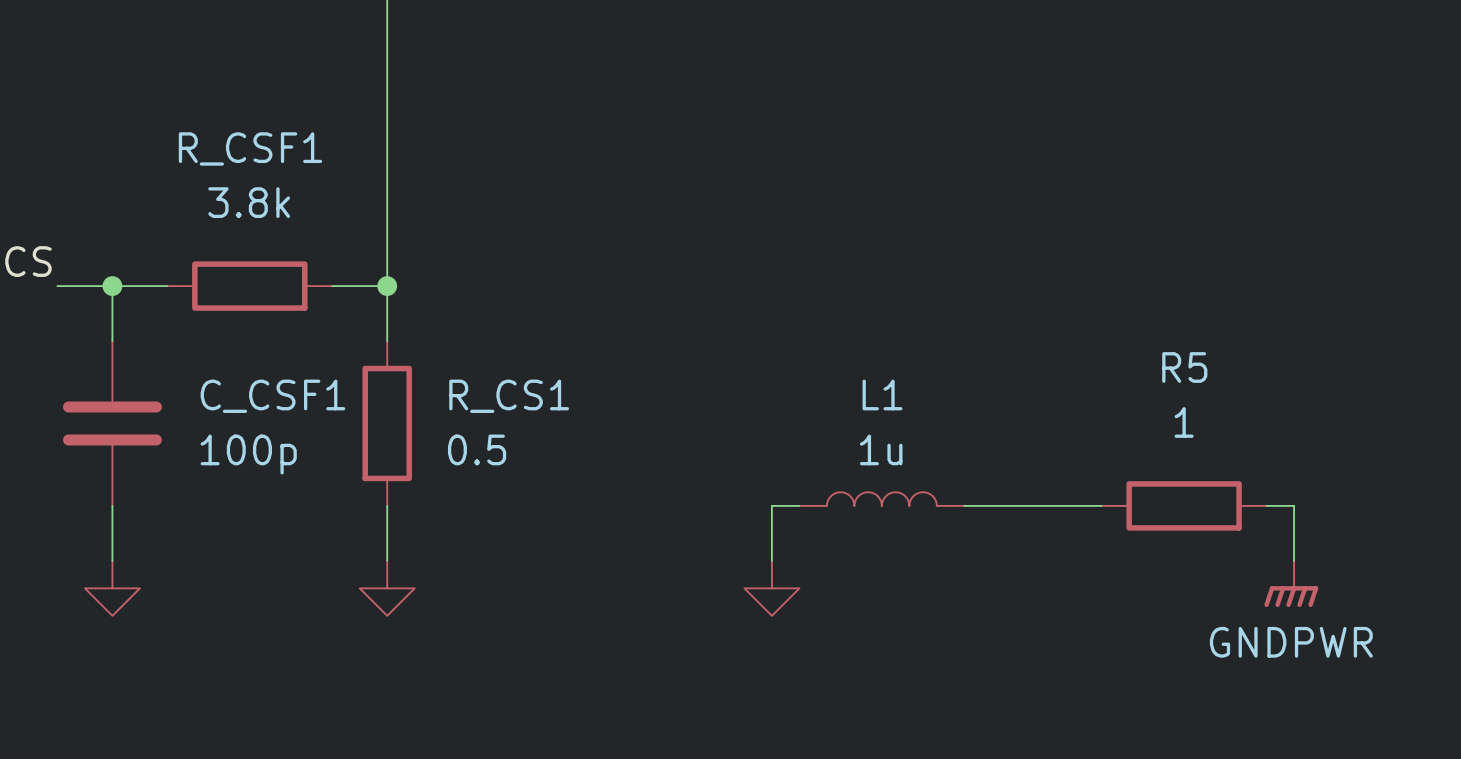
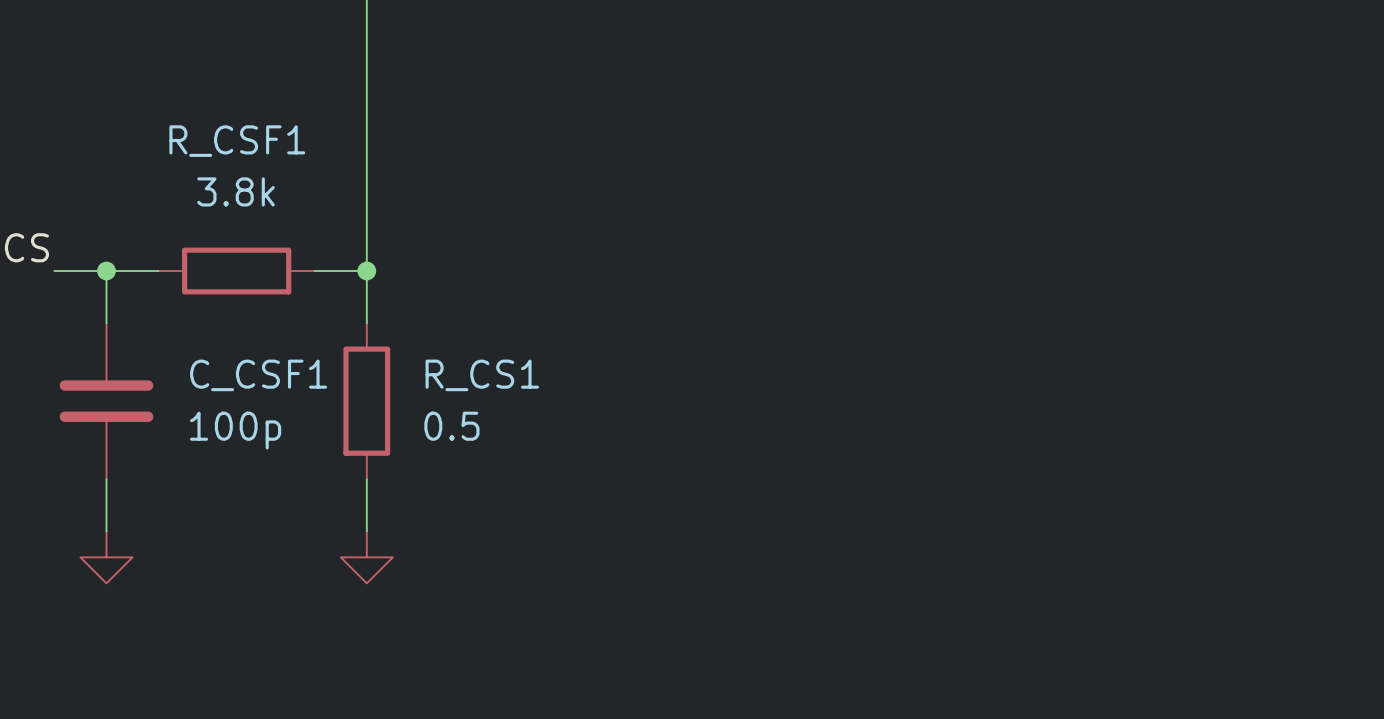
L1: 1u (881, 499) -> none
wire: (799, 505) (771, 505) (771, 560) -> none
wire: (964, 505) (1101, 505) -> none
R5: 1 (1184, 505) -> none
wire: (1266, 505) (1294, 505) (1294, 560) -> none
power symbol: GNDPWR (1291, 583) -> none
power symbol: (771, 588) -> none

